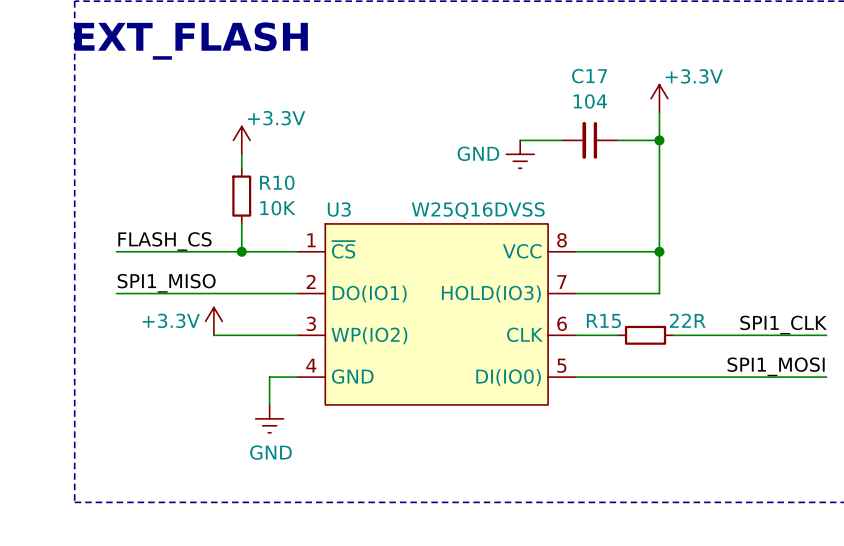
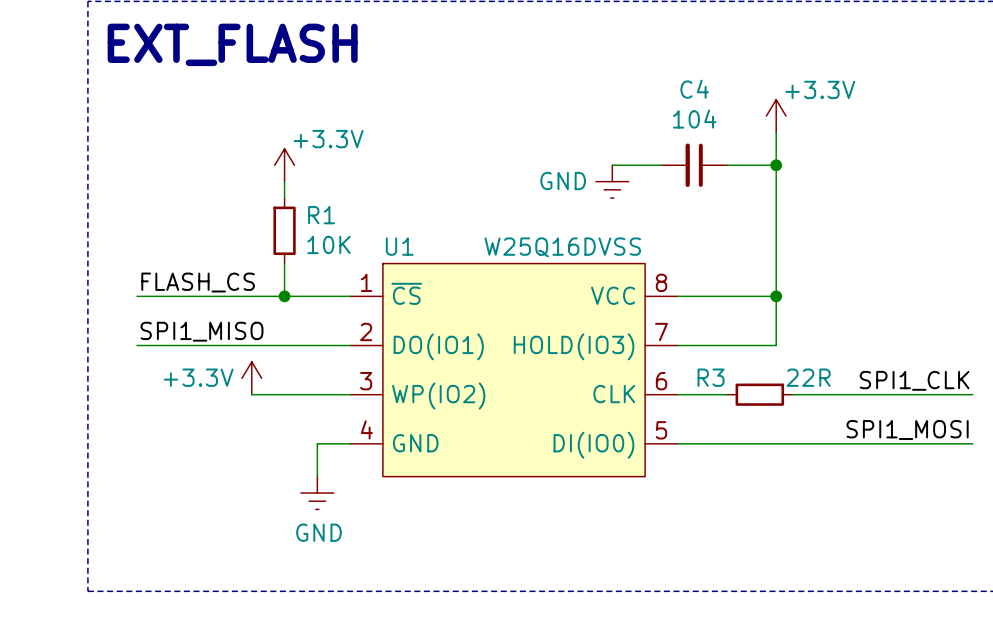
C17 name: C17 (589, 76) -> C4 (694, 89)
R10 name: R10 (277, 182) -> R1 (321, 215)
U3 name: U3 (339, 209) -> U1 (399, 246)
R15 name: R15 (603, 321) -> R3 (711, 377)

